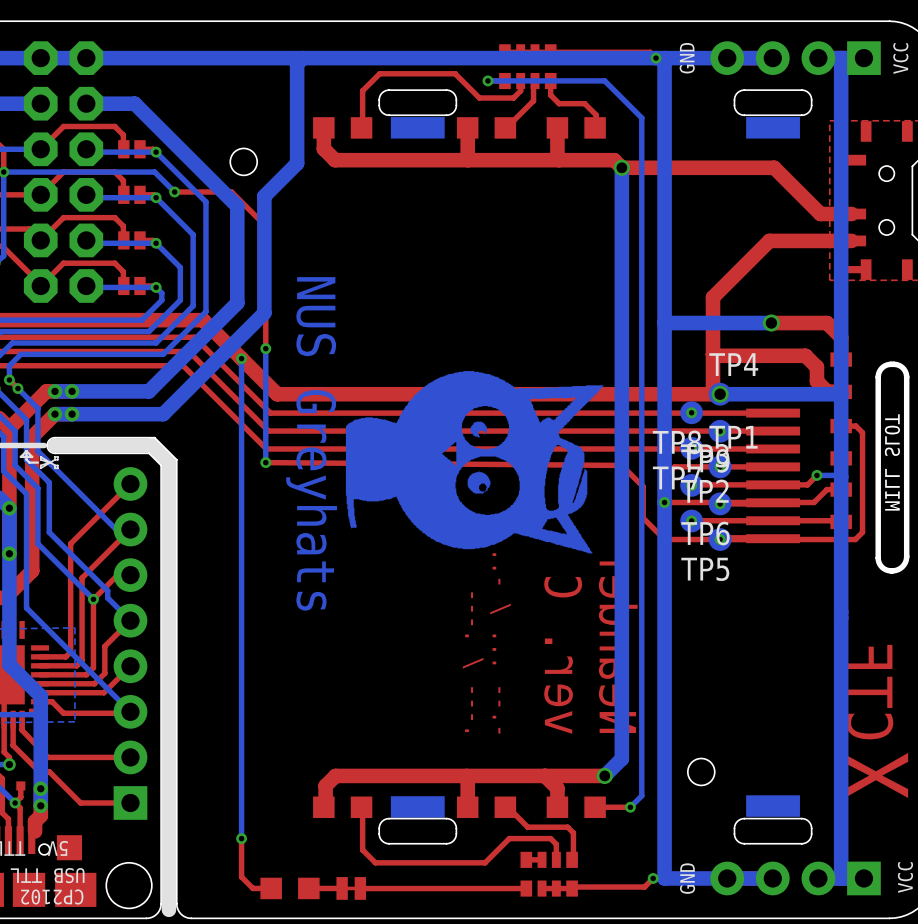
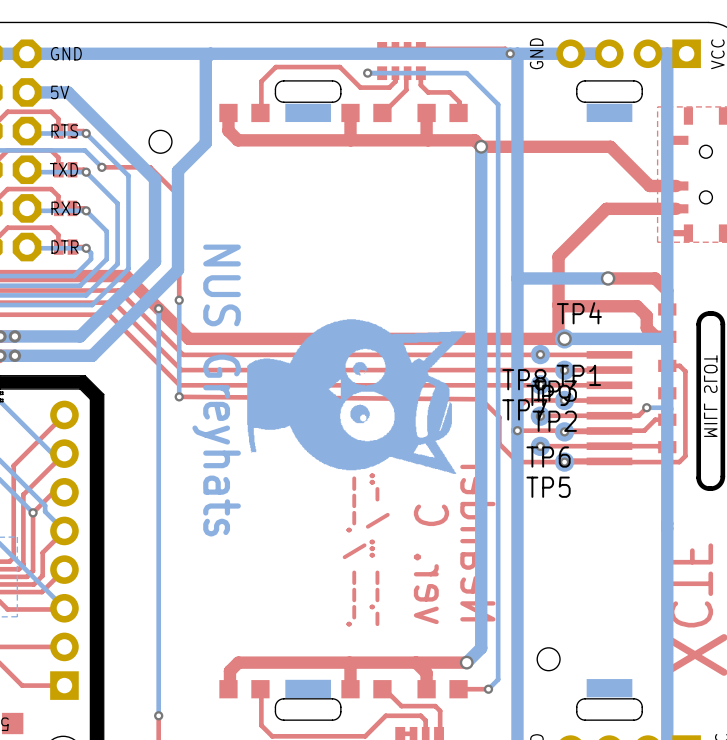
text: none -> GND (66, 53)
text: none -> 5V (60, 92)
text: none -> RTS (64, 131)
text: none -> TXD (63, 169)
text: none -> RXD (66, 208)
text: none -> DTR (65, 247)

